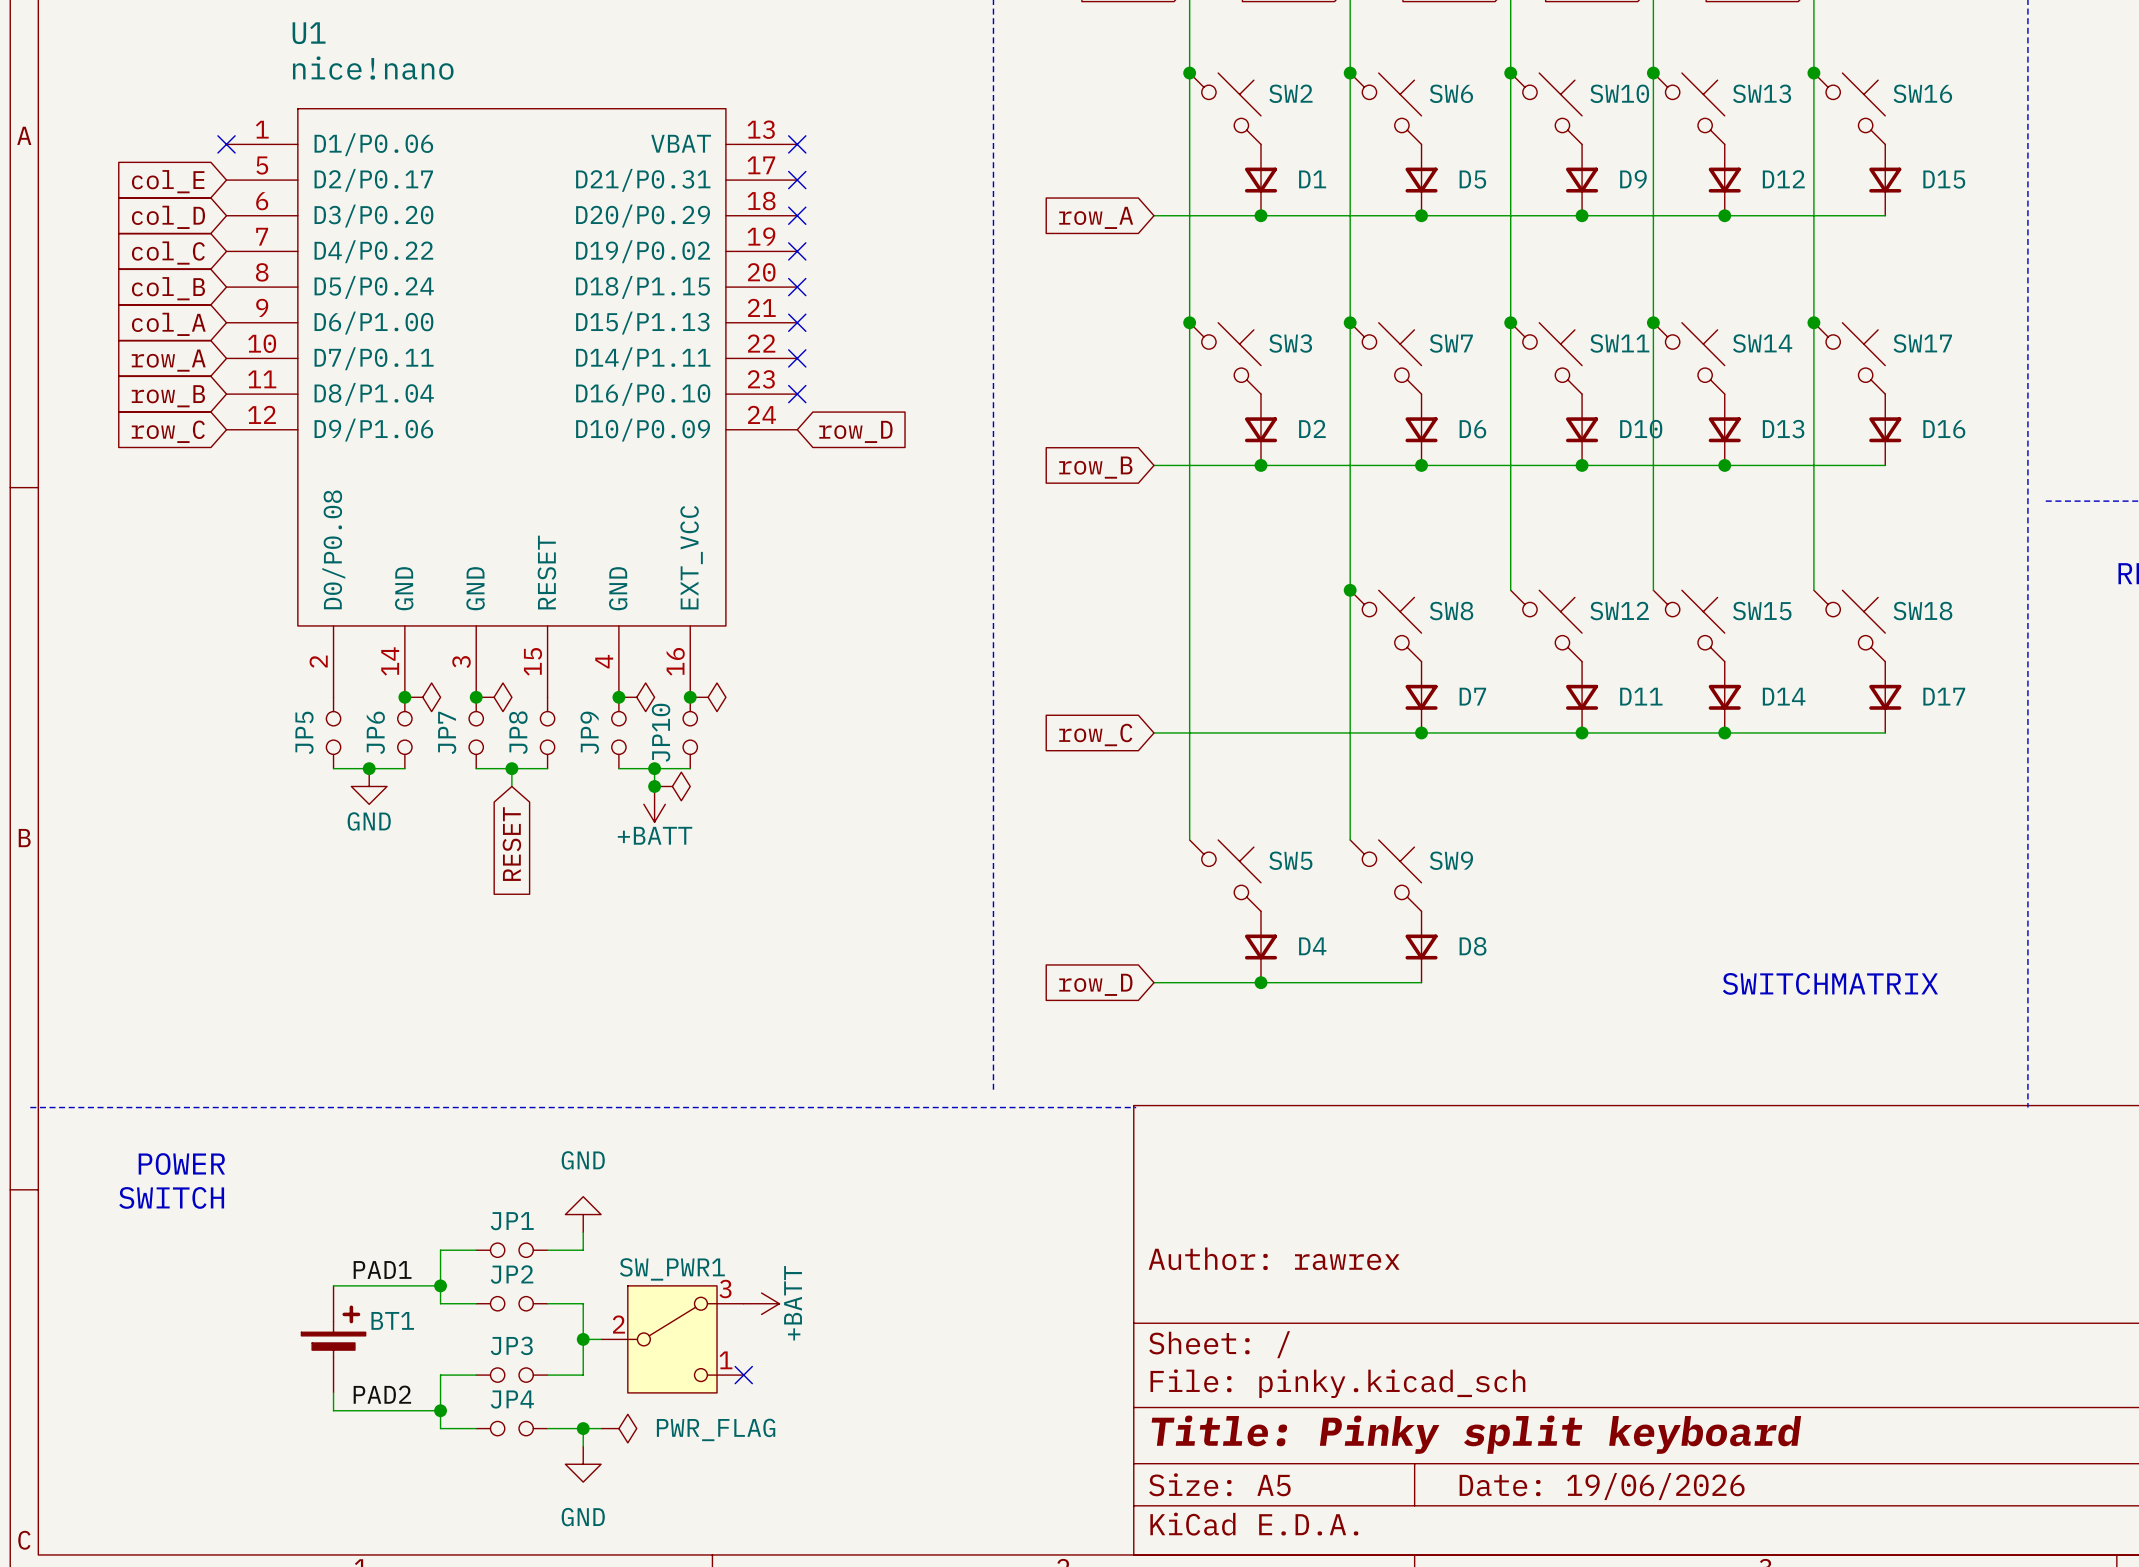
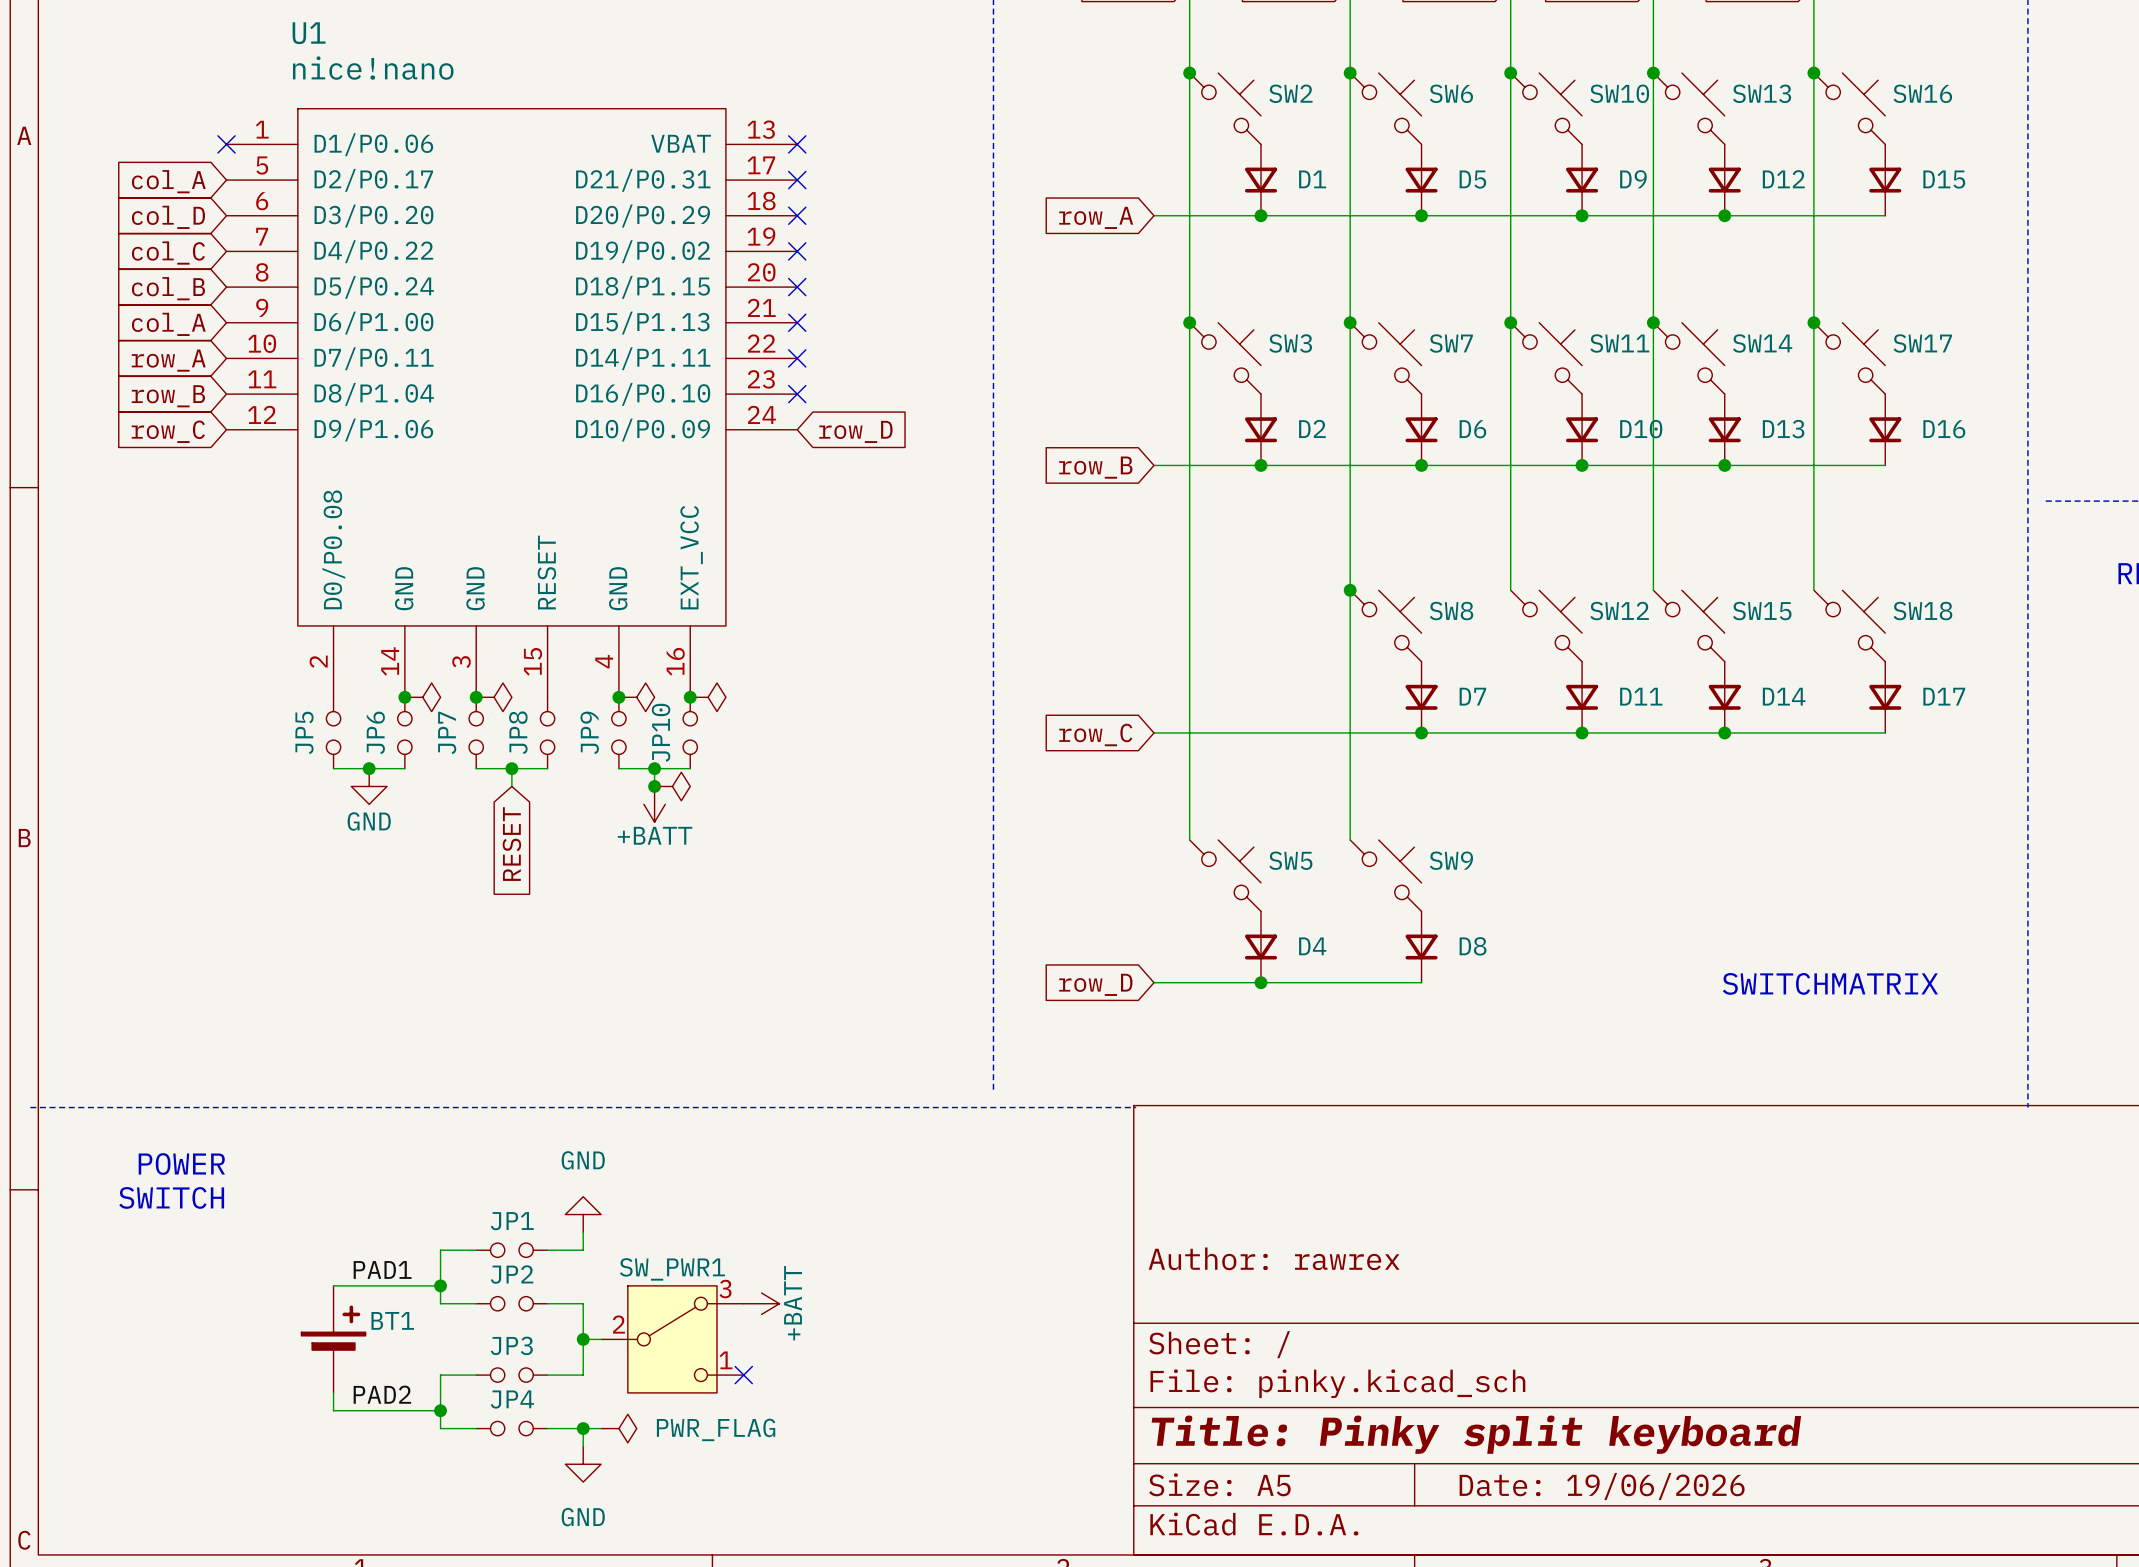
global label: col_E (168, 181) -> col_A (168, 181)

